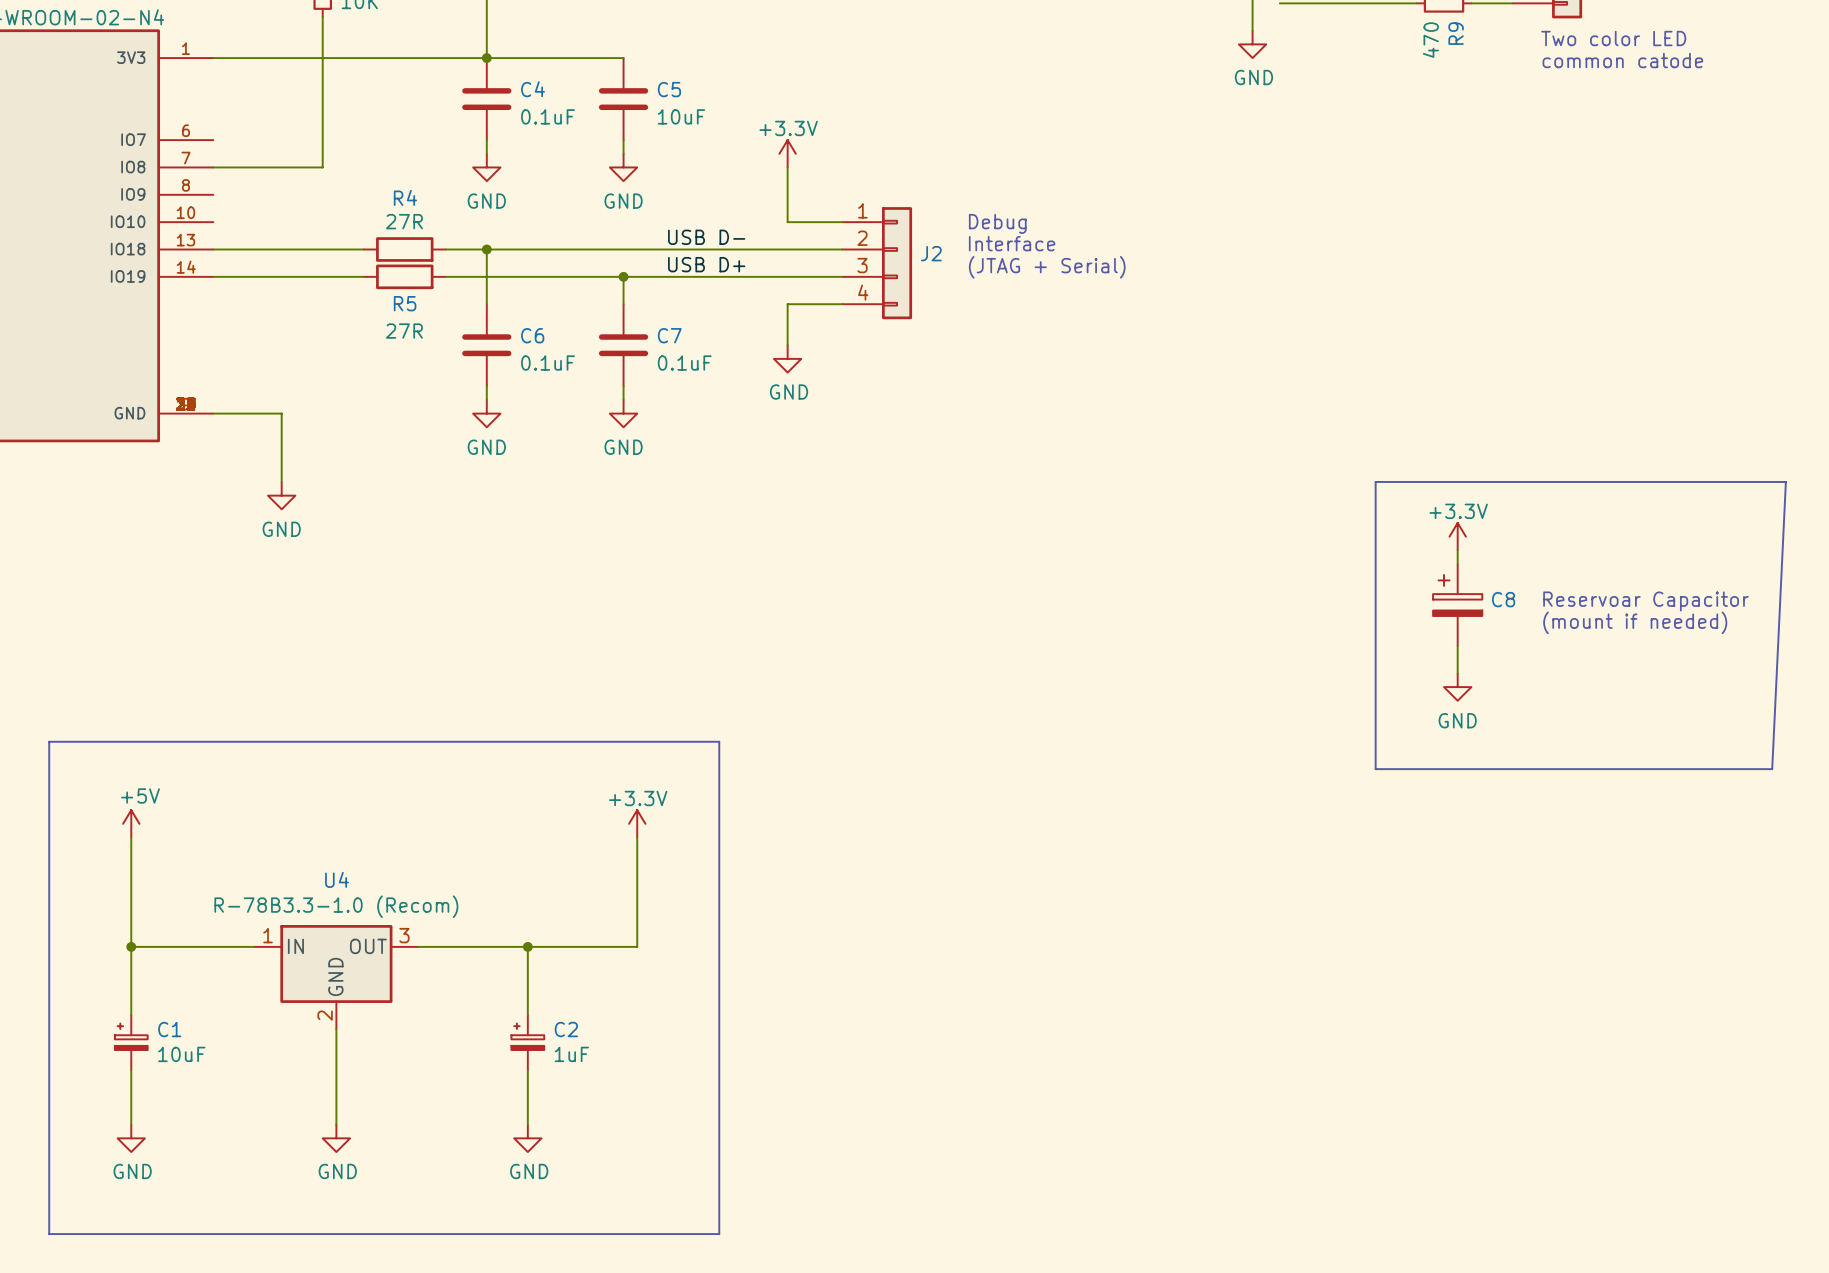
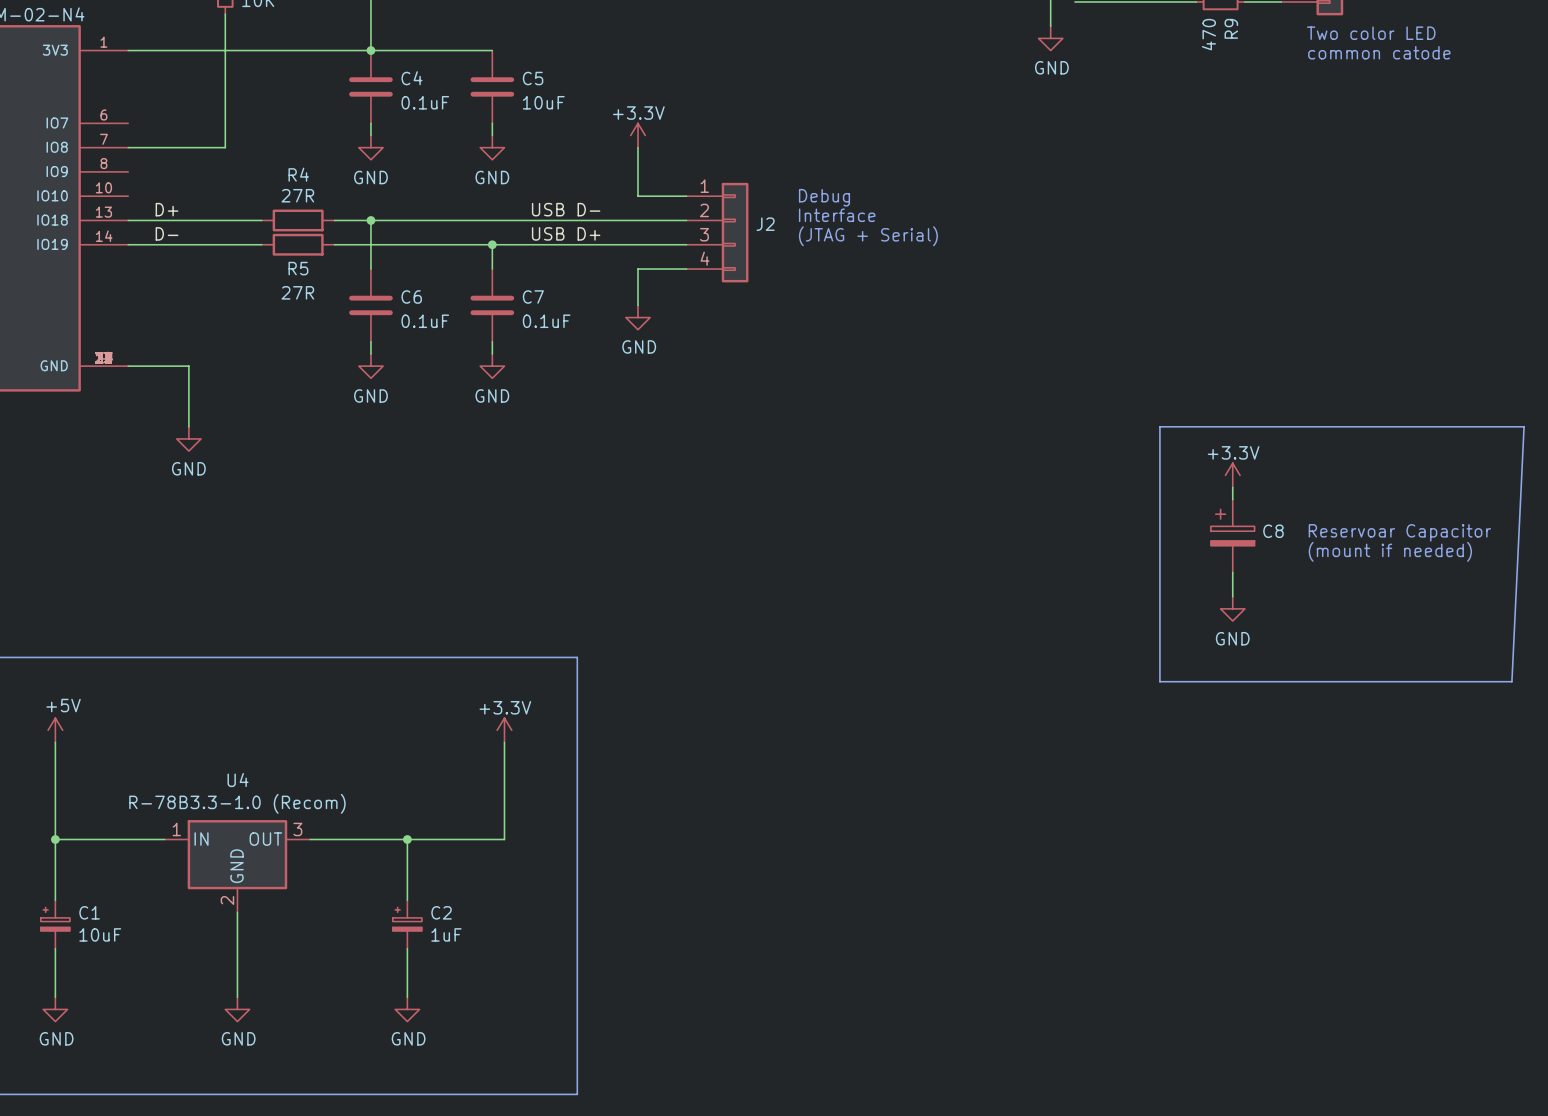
label: none -> D+ (167, 209)
label: none -> D- (167, 233)

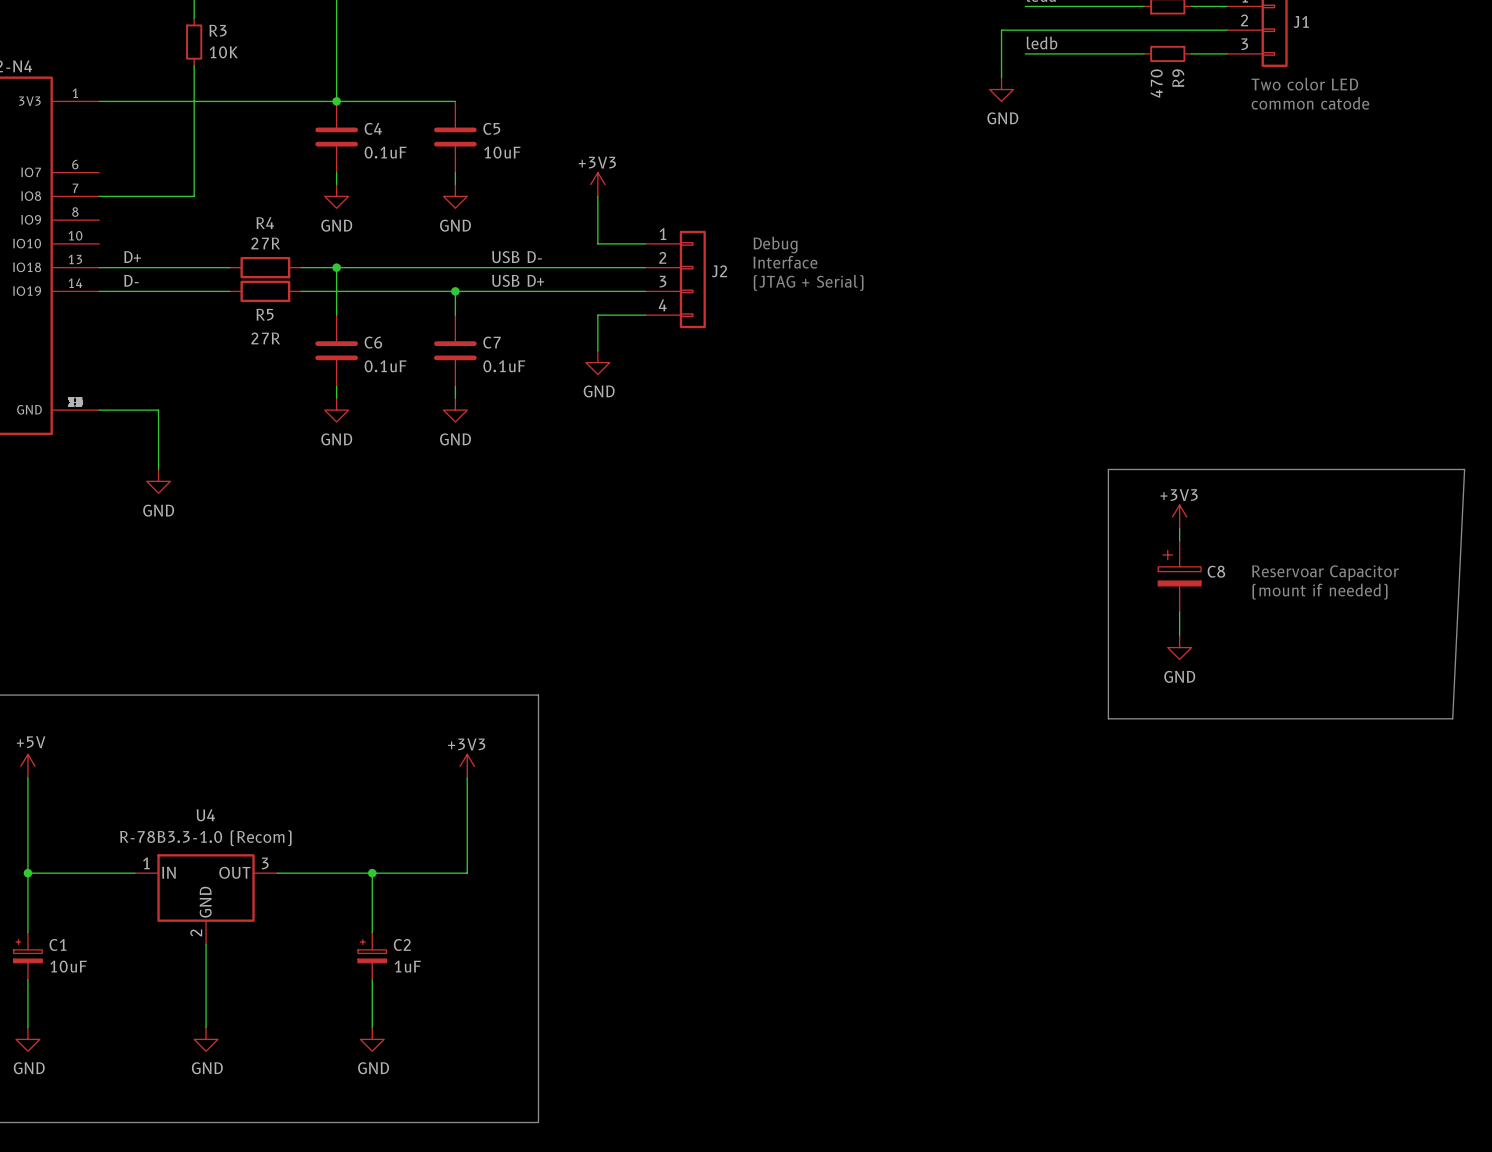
power symbol: +3.3V (638, 135) -> +3V3 (597, 184)
power symbol: +3.3V (1232, 475) -> +3V3 (1179, 516)
power symbol: +3.3V (504, 730) -> +3V3 (467, 766)

